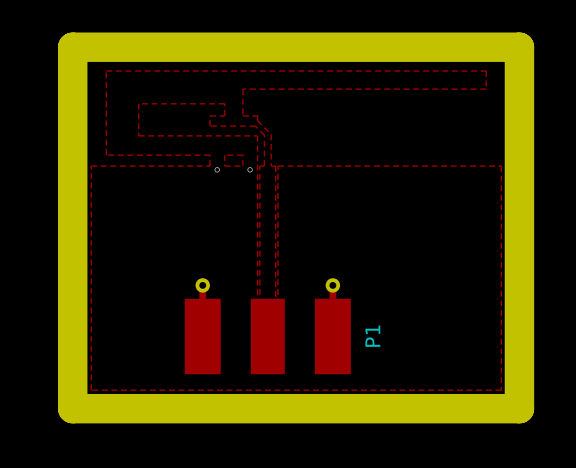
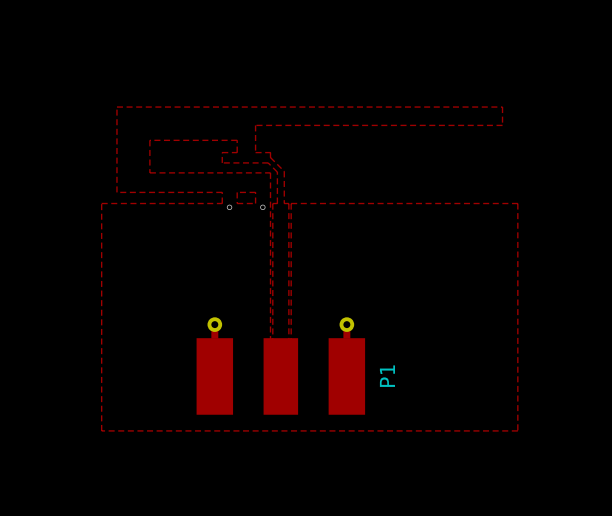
board edge: (72, 47) (72, 408) (519, 408) (519, 47) (72, 47) -> none

